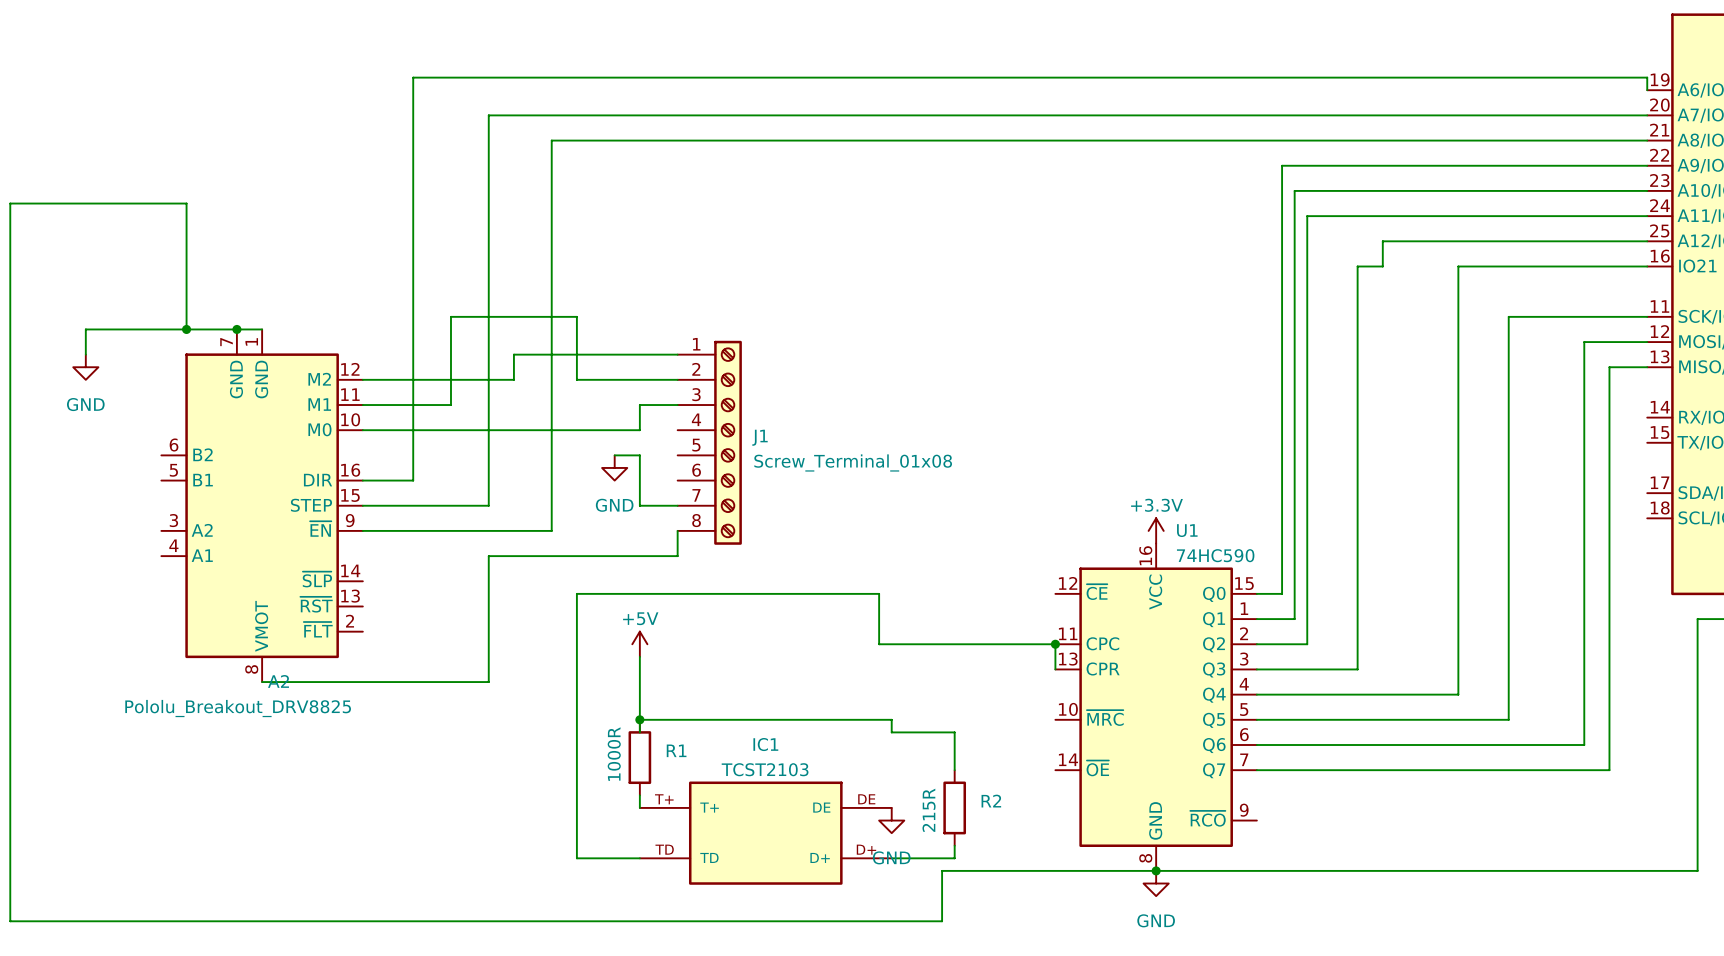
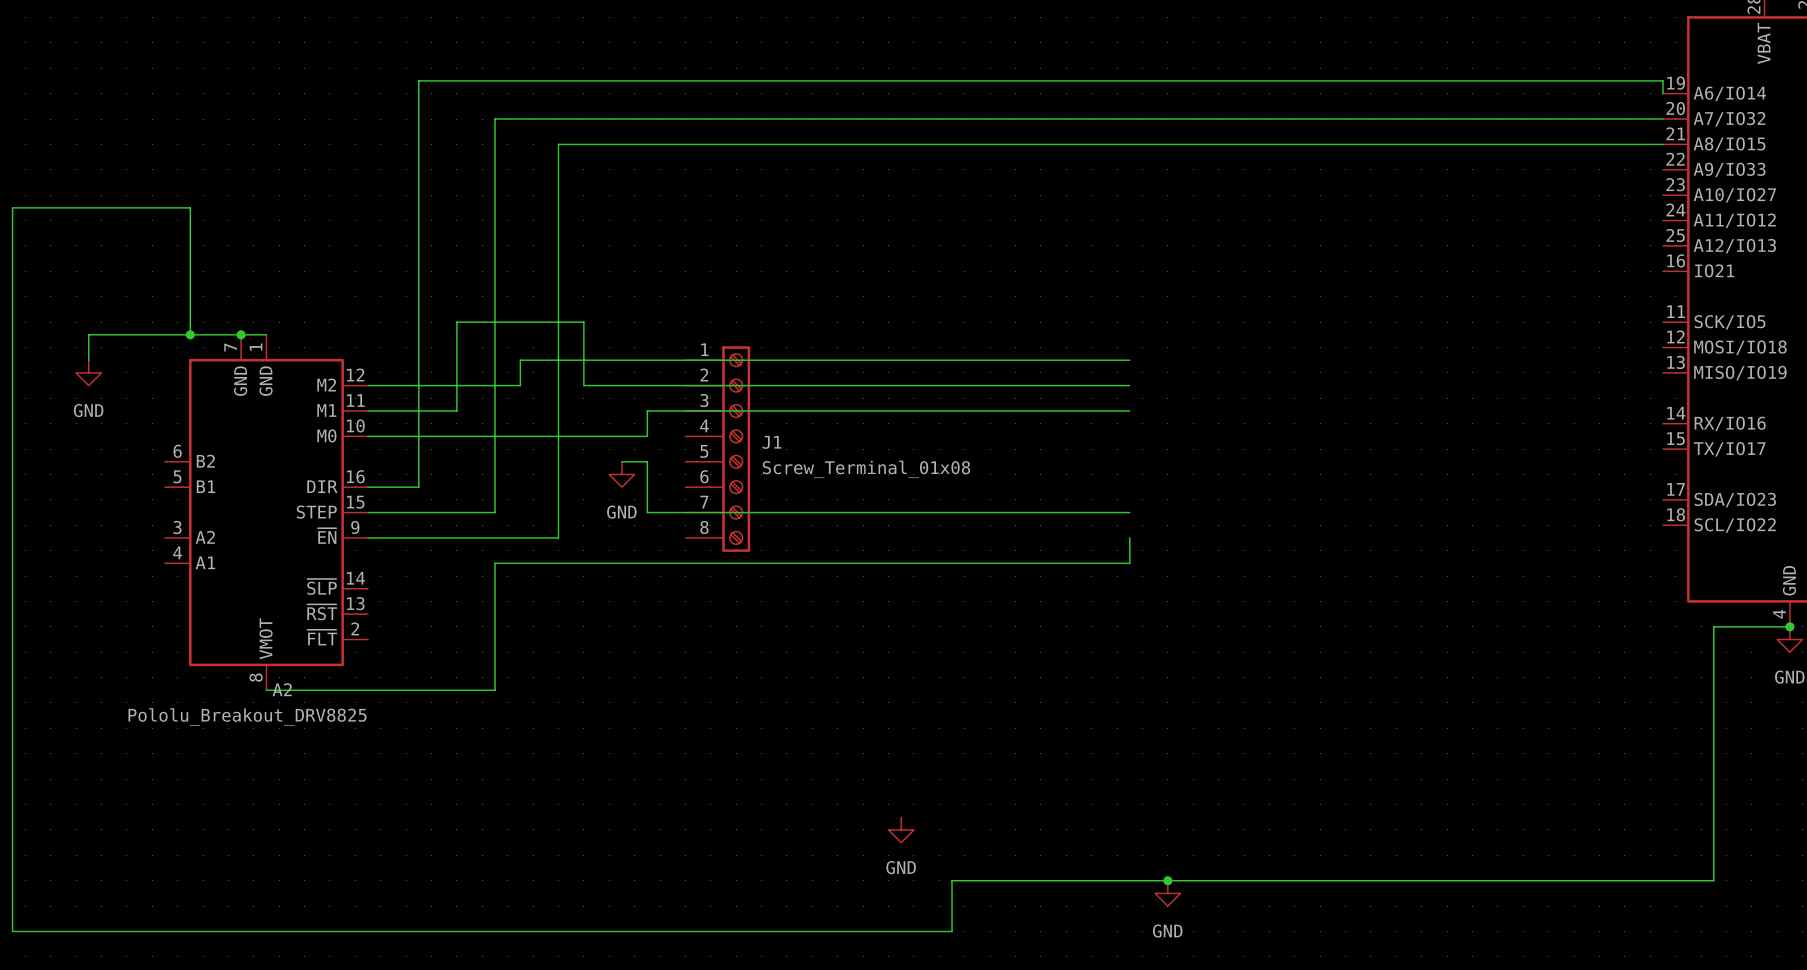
wire: (1647, 165) (1282, 165) (1282, 593) (1256, 593) -> none
wire: (1647, 190) (1294, 190) (1294, 619) (1256, 619) -> none
wire: (1647, 216) (1307, 216) (1307, 644) (1256, 644) -> none
wire: (1647, 241) (1382, 241) (1382, 266) (1357, 266) (1357, 669) (1256, 669) -> none
wire: (1647, 266) (1458, 266) (1458, 694) (1256, 694) -> none
wire: (1647, 316) (1508, 316) (1508, 719) (1256, 719) -> none
wire: (1647, 342) (1584, 342) (1584, 745) (1256, 745) -> none
wire: none -> (685, 360) (1129, 360)
wire: (1647, 367) (1609, 367) (1609, 770) (1256, 770) -> none
wire: none -> (685, 385) (1129, 385)
wire: none -> (685, 411) (1129, 411)
wire: none -> (685, 512) (1129, 512)
wire: (677, 530) (677, 556) -> (1129, 537) (1129, 563) (685, 563)
power symbol: +3.3V (1156, 530) -> none
power symbol: +5V (639, 644) -> none
junction: (1055, 644) -> none
wire: (639, 656) (639, 732) -> none
wire: (1055, 669) (1055, 644) (879, 644) (879, 593) (576, 593) (576, 858) (639, 858) -> none
U1: 74HC590 (1156, 707) -> none
wire: (639, 719) (891, 719) (891, 732) (954, 732) (954, 770) -> none
junction: (639, 719) -> none
R1: 1000R (639, 757) -> none
wire: (639, 795) (639, 807) -> none
R2: 215R (954, 807) -> none
IC1: TCST2103 (765, 833) -> none
wire: (954, 845) (954, 858) (891, 858) -> none

